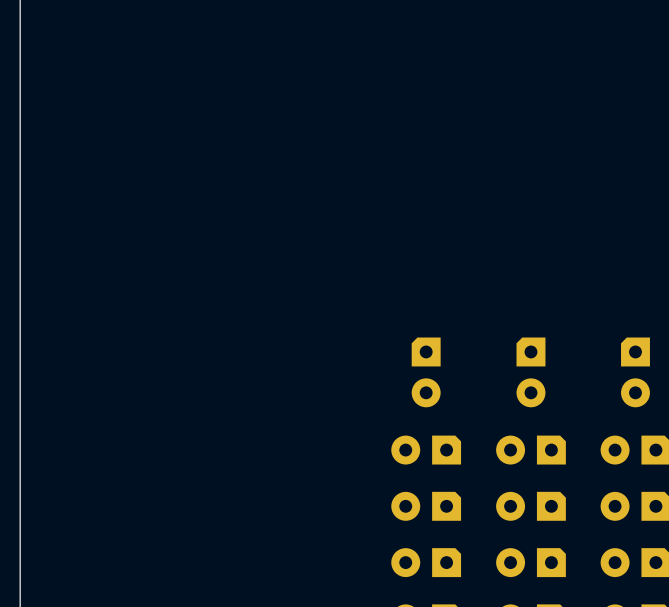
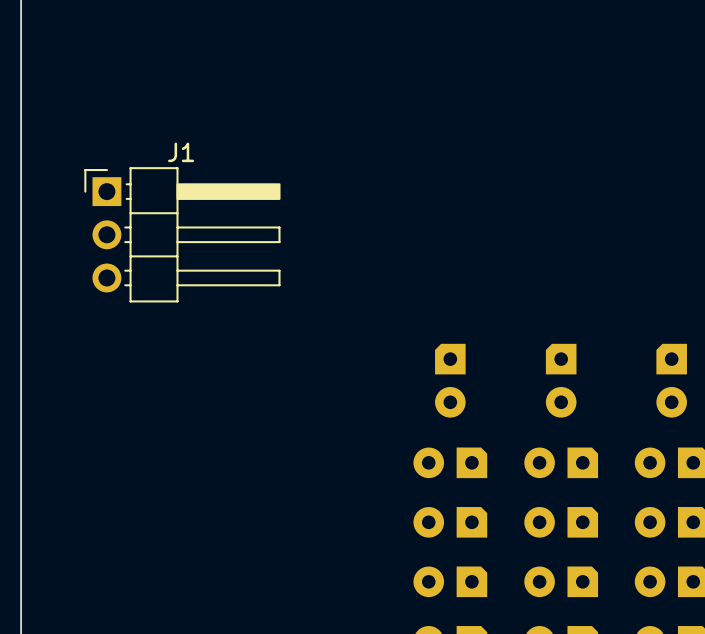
J1: none -> (182, 234)

